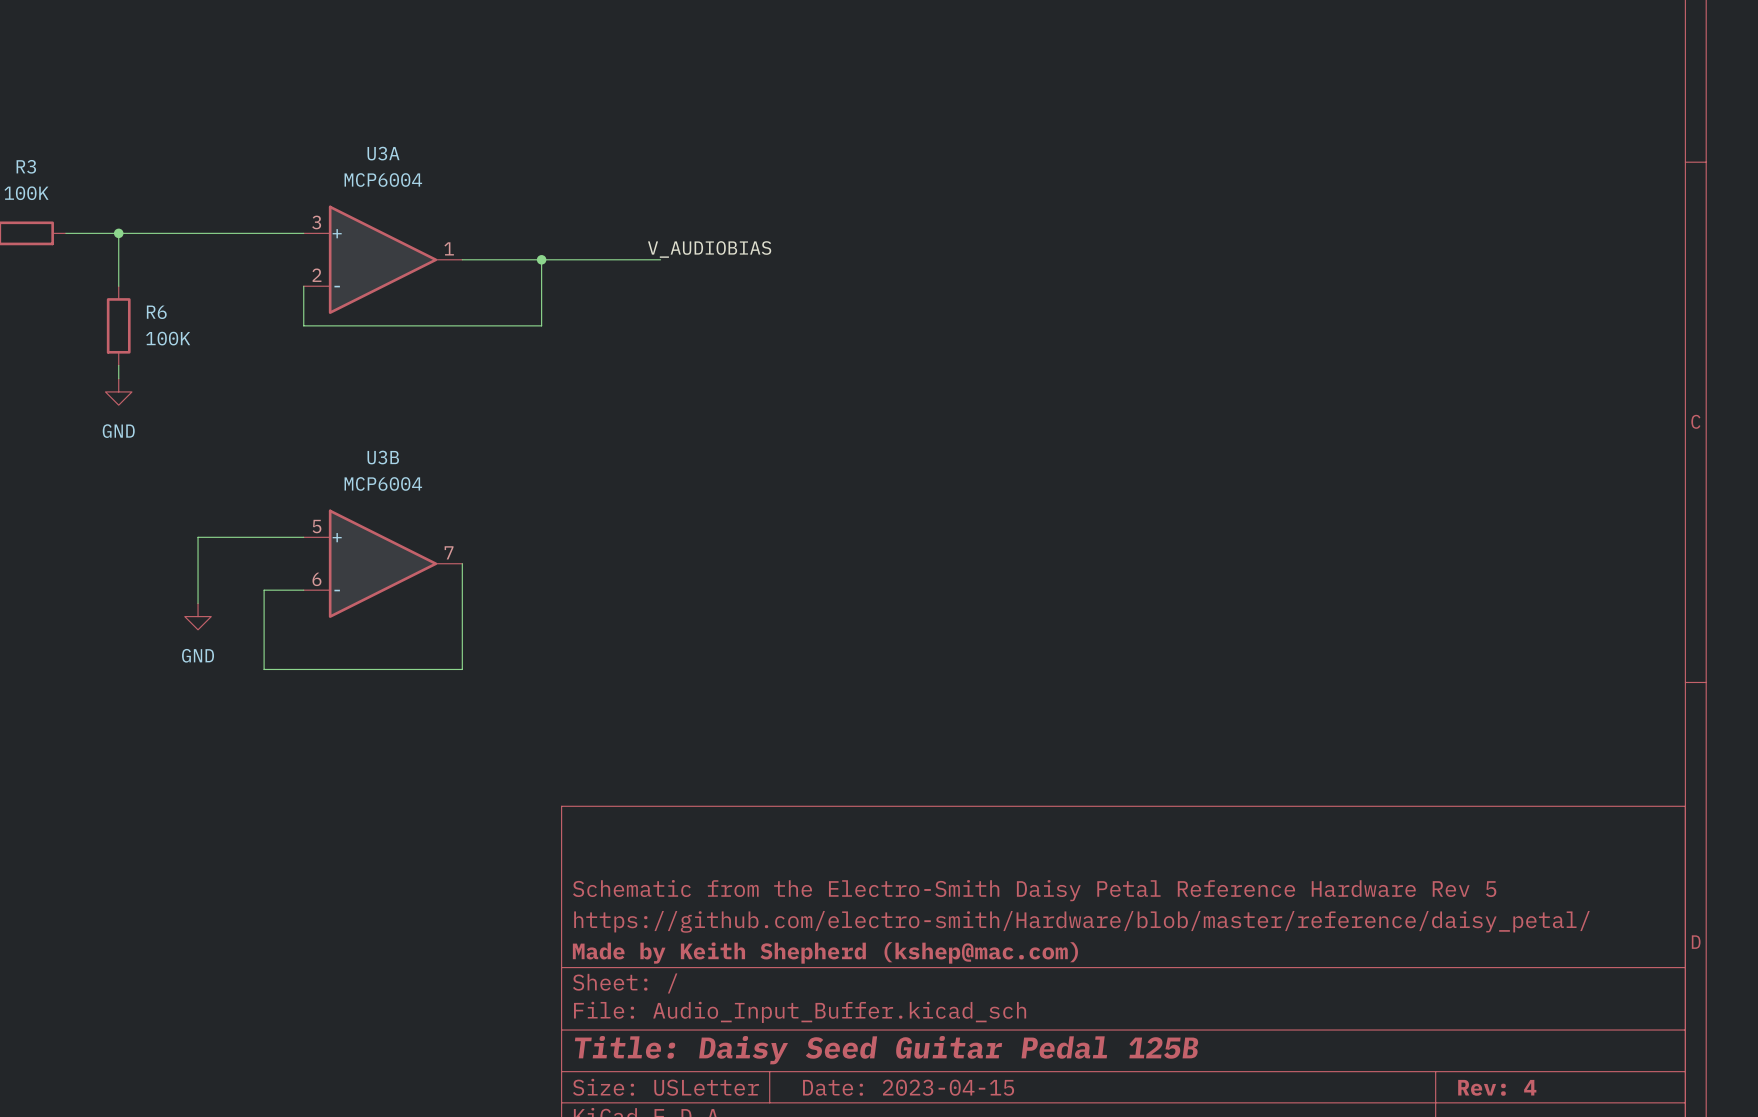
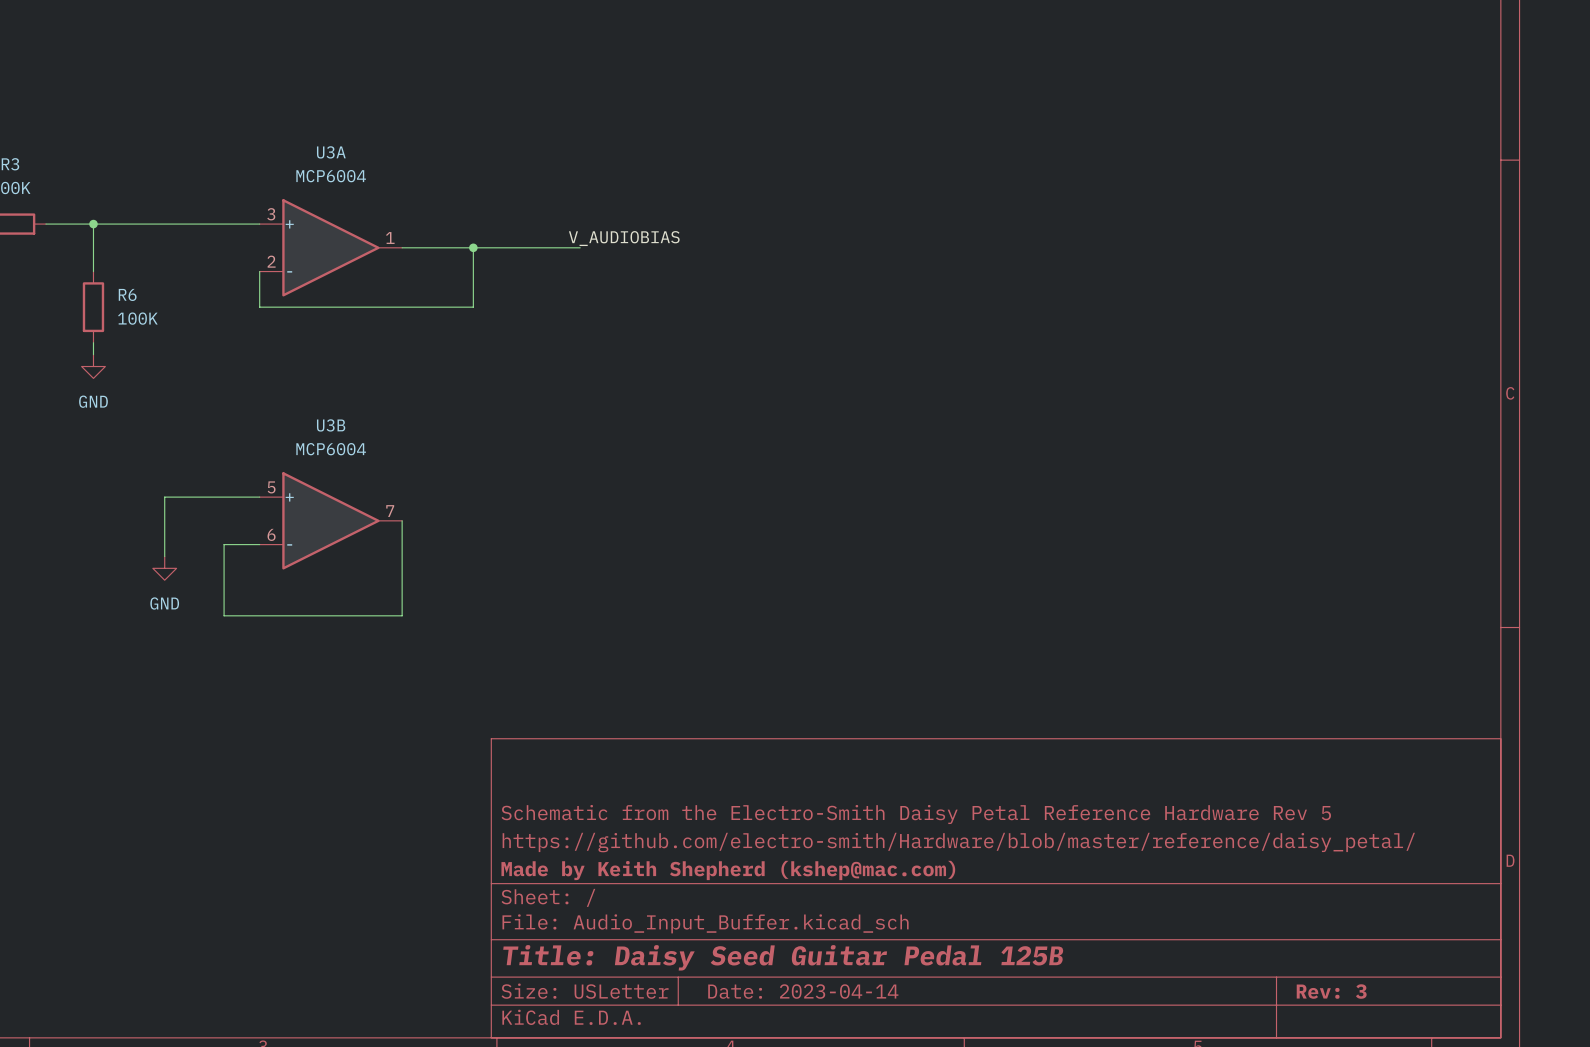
title block: Date: 2023-04-15 (908, 1087) -> Date: 2023-04-14 (803, 991)
title block: Rev: 4 (1497, 1087) -> Rev: 3 (1331, 991)

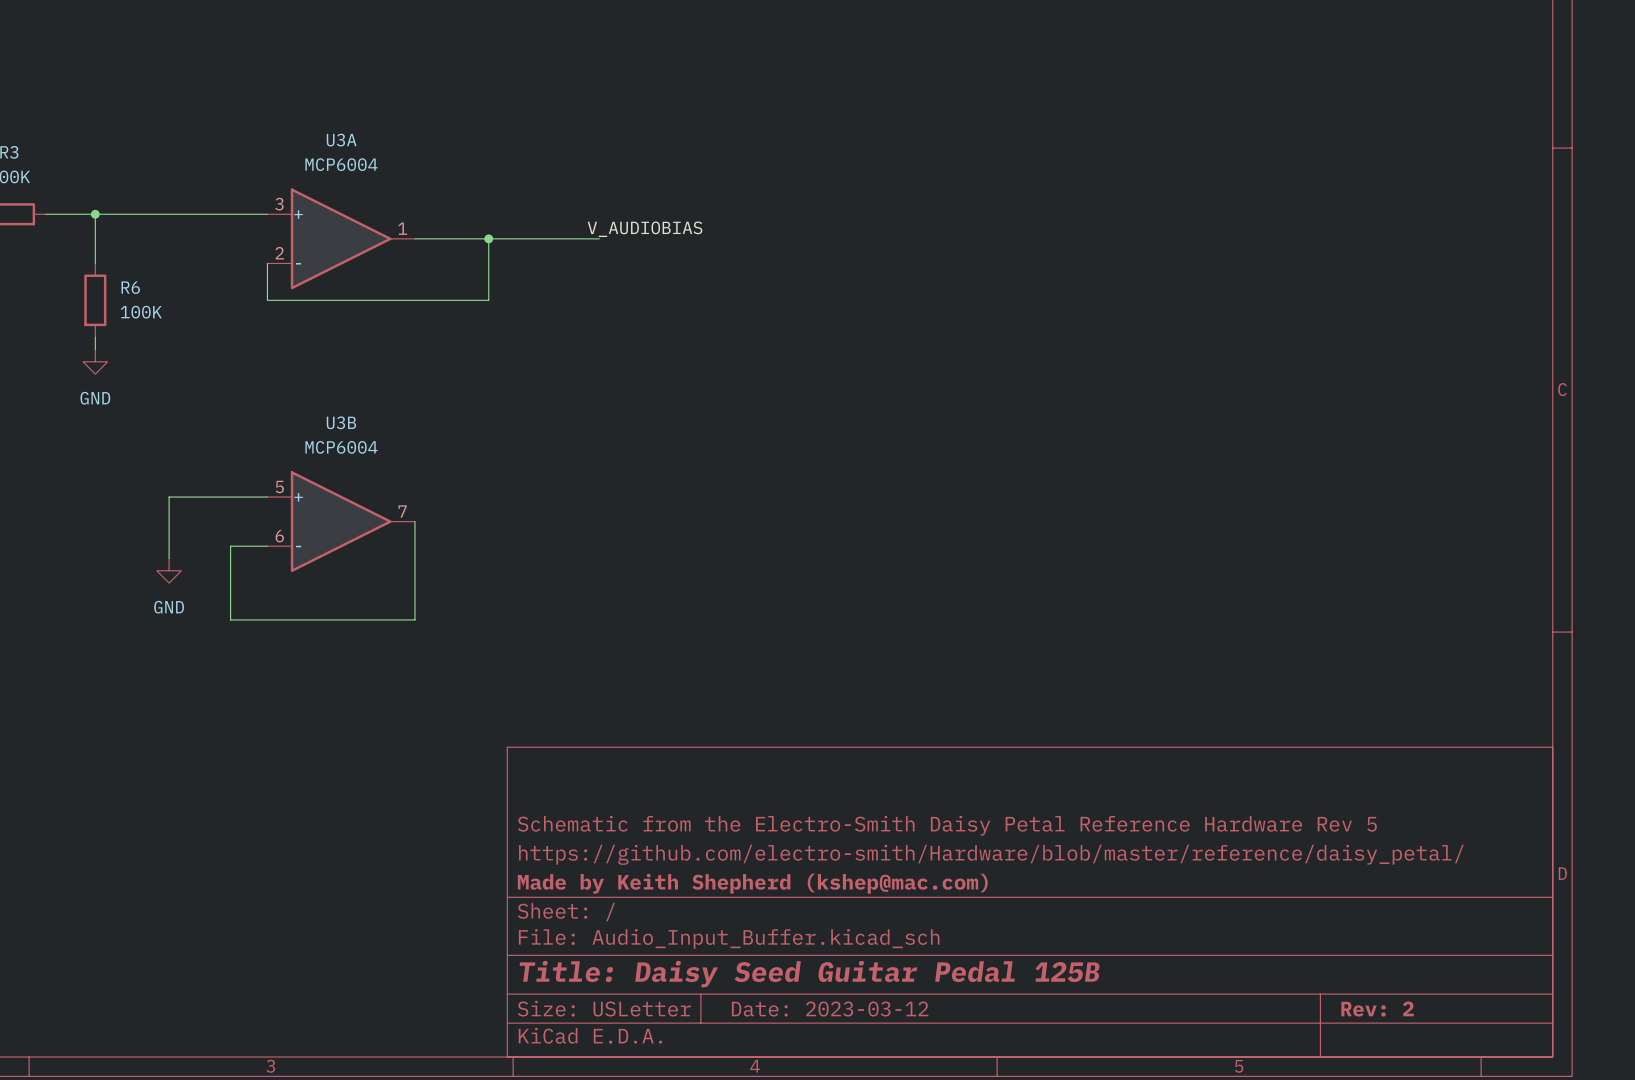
title block: Date: 2023-04-14 (803, 991) -> Date: 2023-03-12 (830, 1009)
title block: Rev: 3 (1331, 991) -> Rev: 2 (1377, 1009)

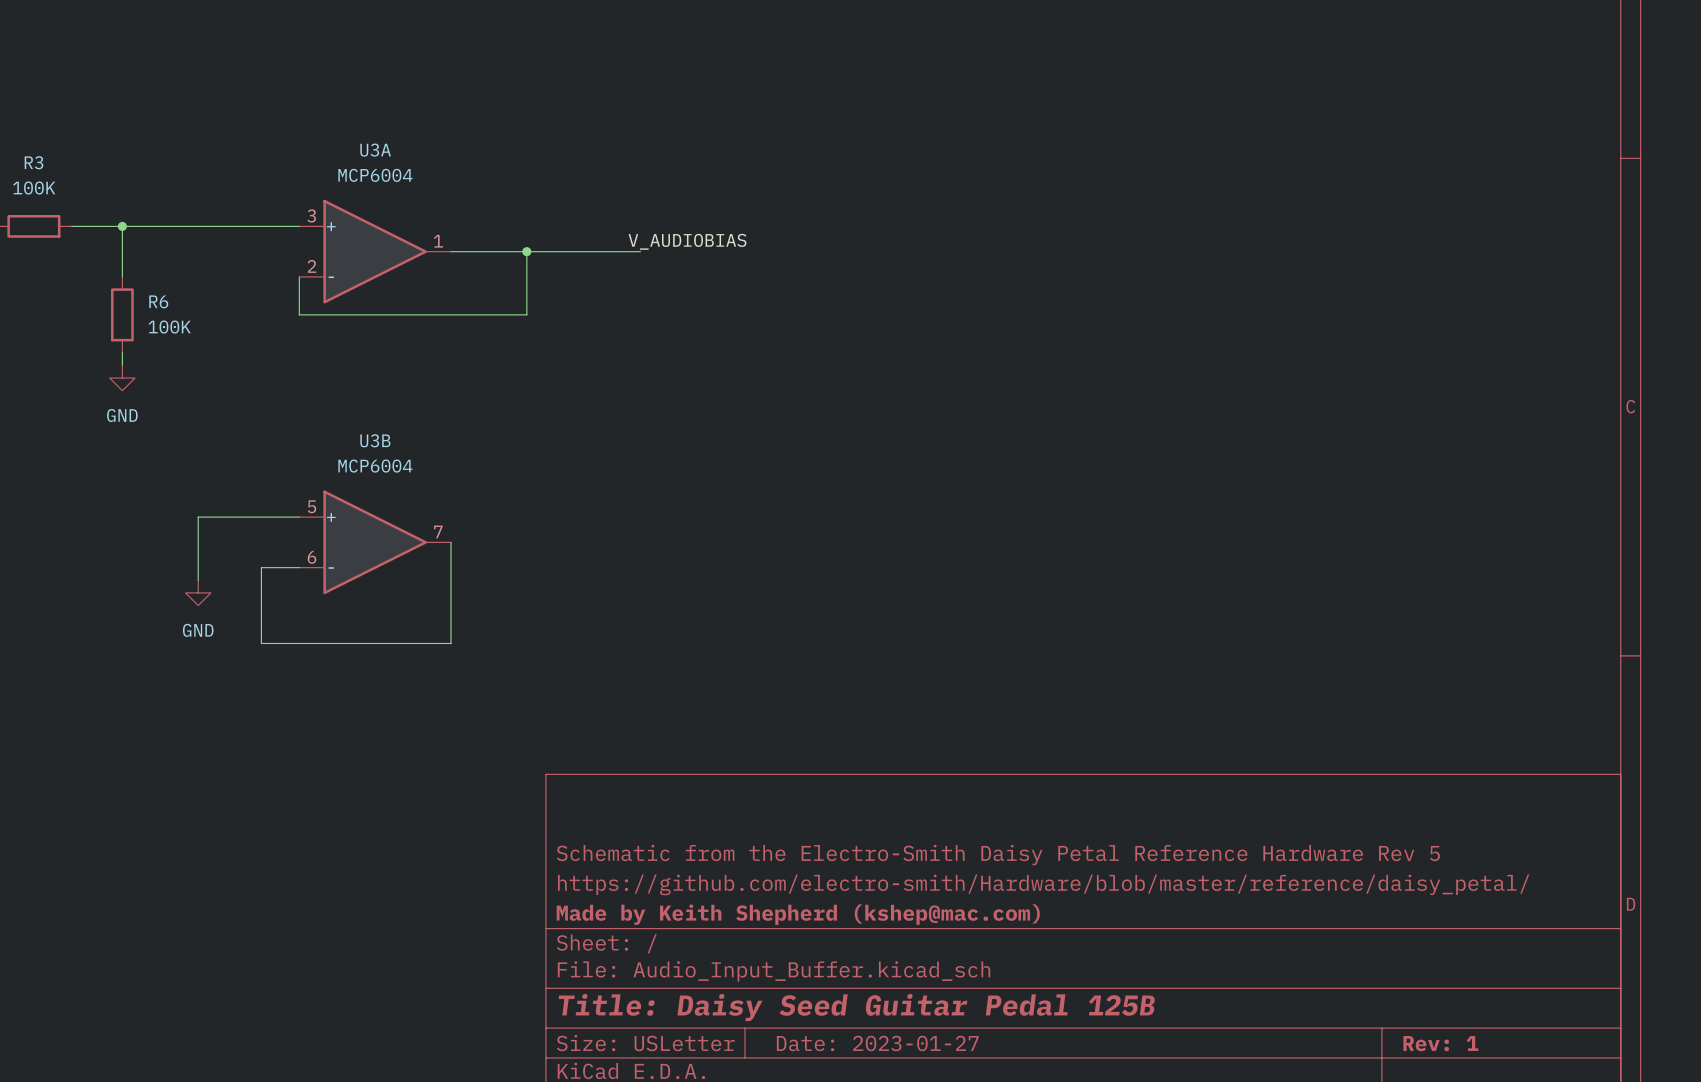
title block: Date: 2023-03-12 (830, 1009) -> Date: 2023-01-27 (877, 1043)
title block: Rev: 2 (1377, 1009) -> Rev: 1 (1440, 1043)

